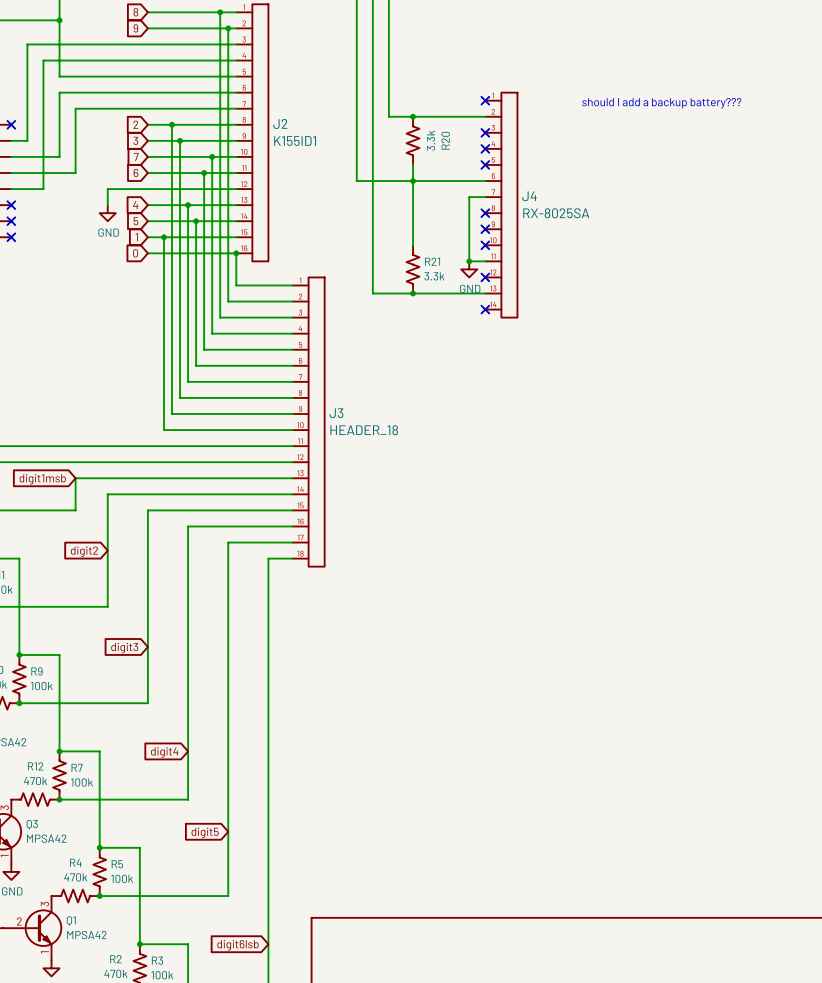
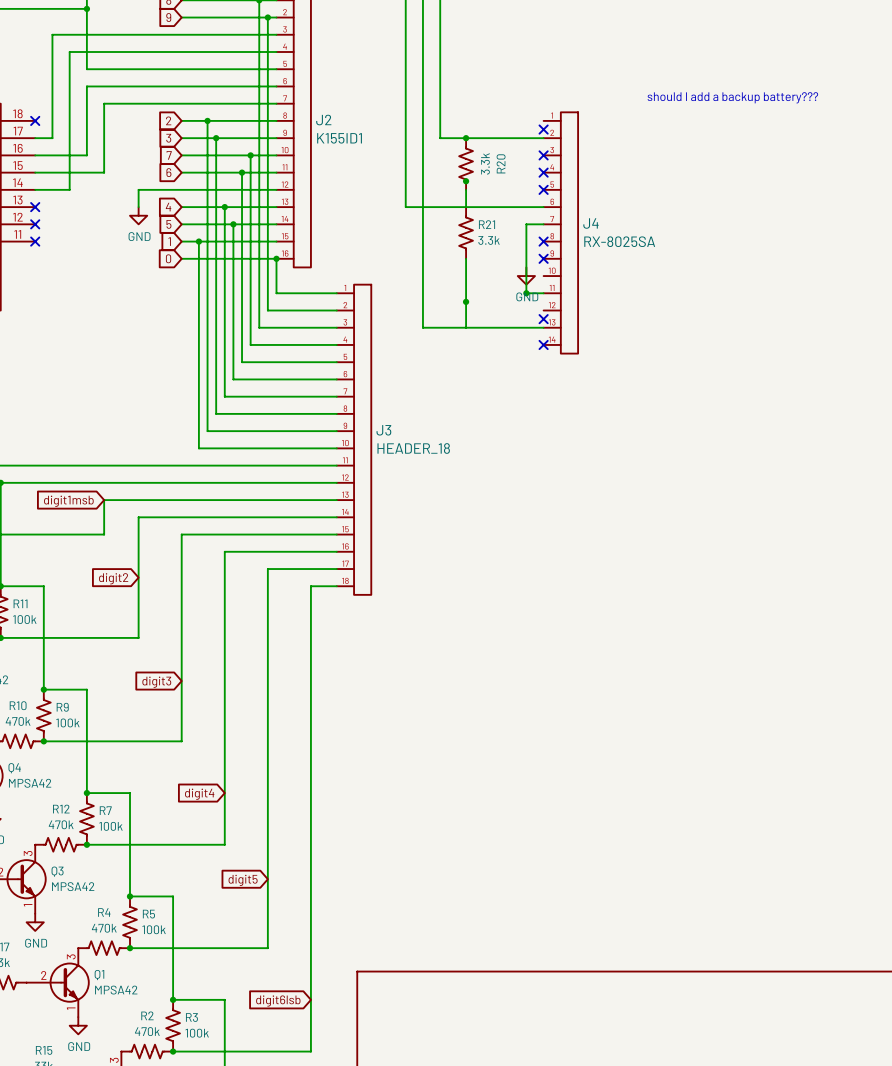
no-connect mark: (485, 100) -> none
wire: (388, 116) (485, 116) -> (440, 112) (440, 138) (543, 138)
junction position: (413, 116) -> (466, 138)
R20 position: (413, 140) -> (466, 164)
no-connect mark: (485, 148) -> none
no-connect mark: none -> (543, 155)
no-connect mark: (485, 164) -> none
no-connect mark: none -> (543, 172)
wire: (356, 181) (485, 181) -> (405, 181) (405, 207) (543, 207)
no-connect mark: none -> (543, 189)
wire: (485, 197) (469, 197) (469, 221) -> (543, 224) (526, 224)
J4 position: (501, 205) -> (560, 232)
no-connect mark: (485, 213) -> none
no-connect mark: (485, 229) -> none
no-connect mark: none -> (543, 241)
no-connect mark: (485, 245) -> none
wire: none -> (466, 258) (466, 327)
no-connect mark: none -> (543, 258)
wire: (469, 261) (485, 261) -> (526, 267) (526, 293) (543, 293)
junction position: (469, 261) -> (526, 293)
R21 position: (413, 269) -> (466, 232)
no-connect mark: (485, 277) -> none
wire: (372, 293) (485, 293) -> (422, 301) (422, 327) (543, 327)
no-connect mark: none -> (543, 344)

